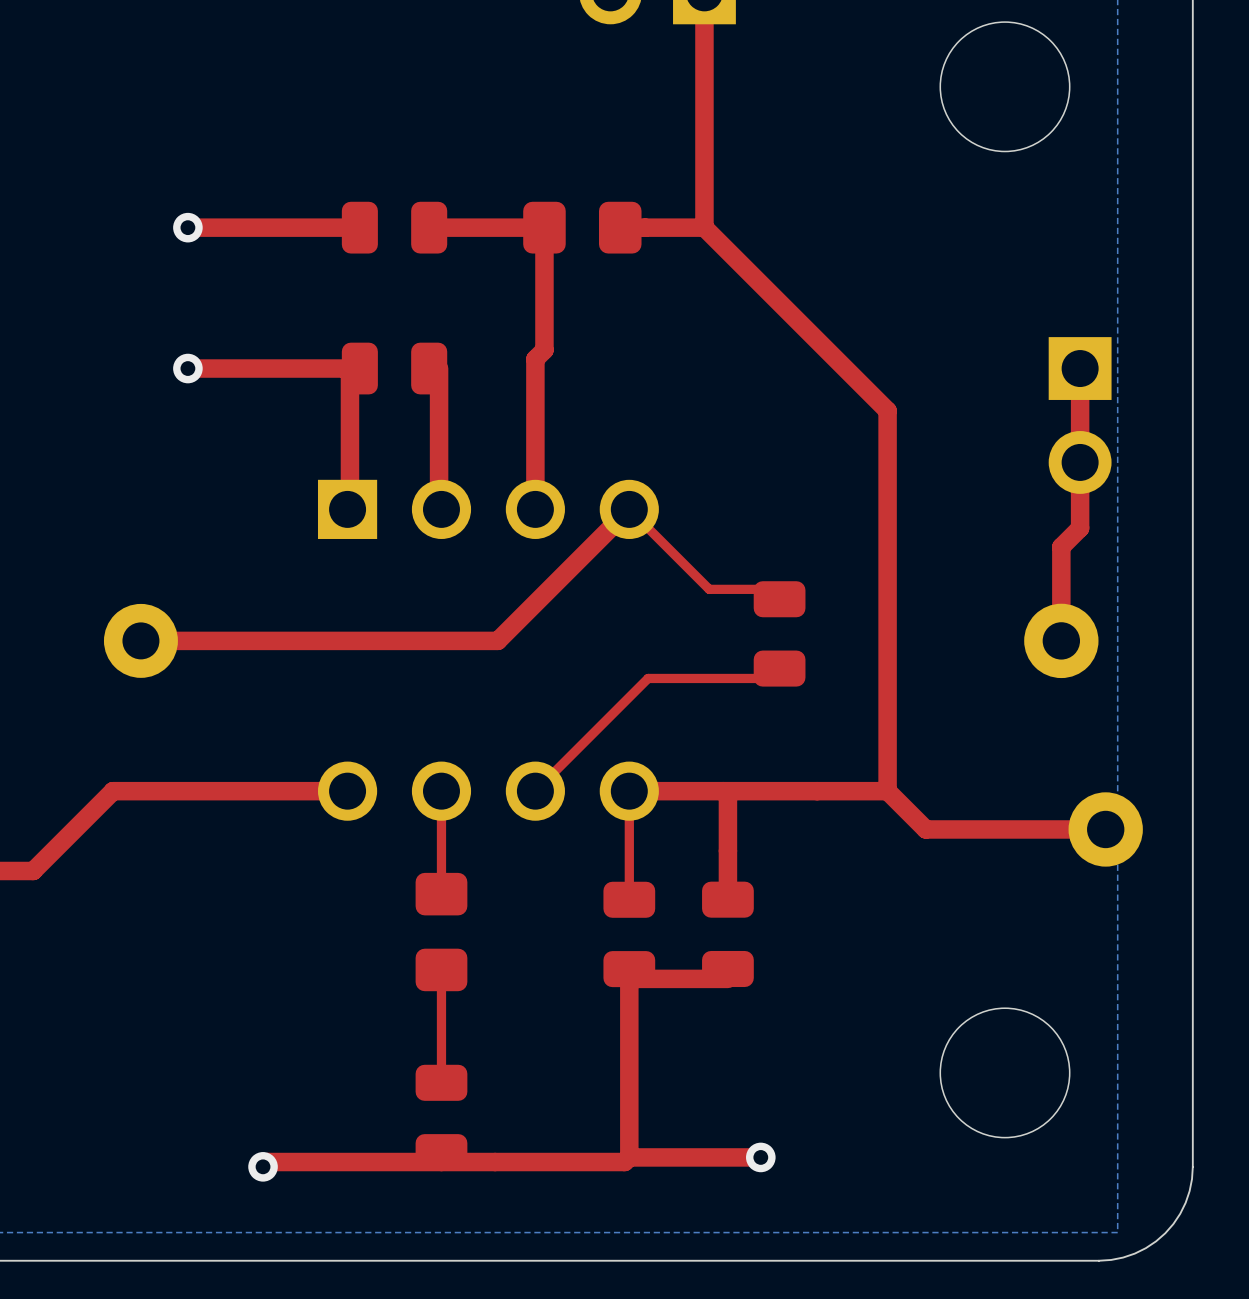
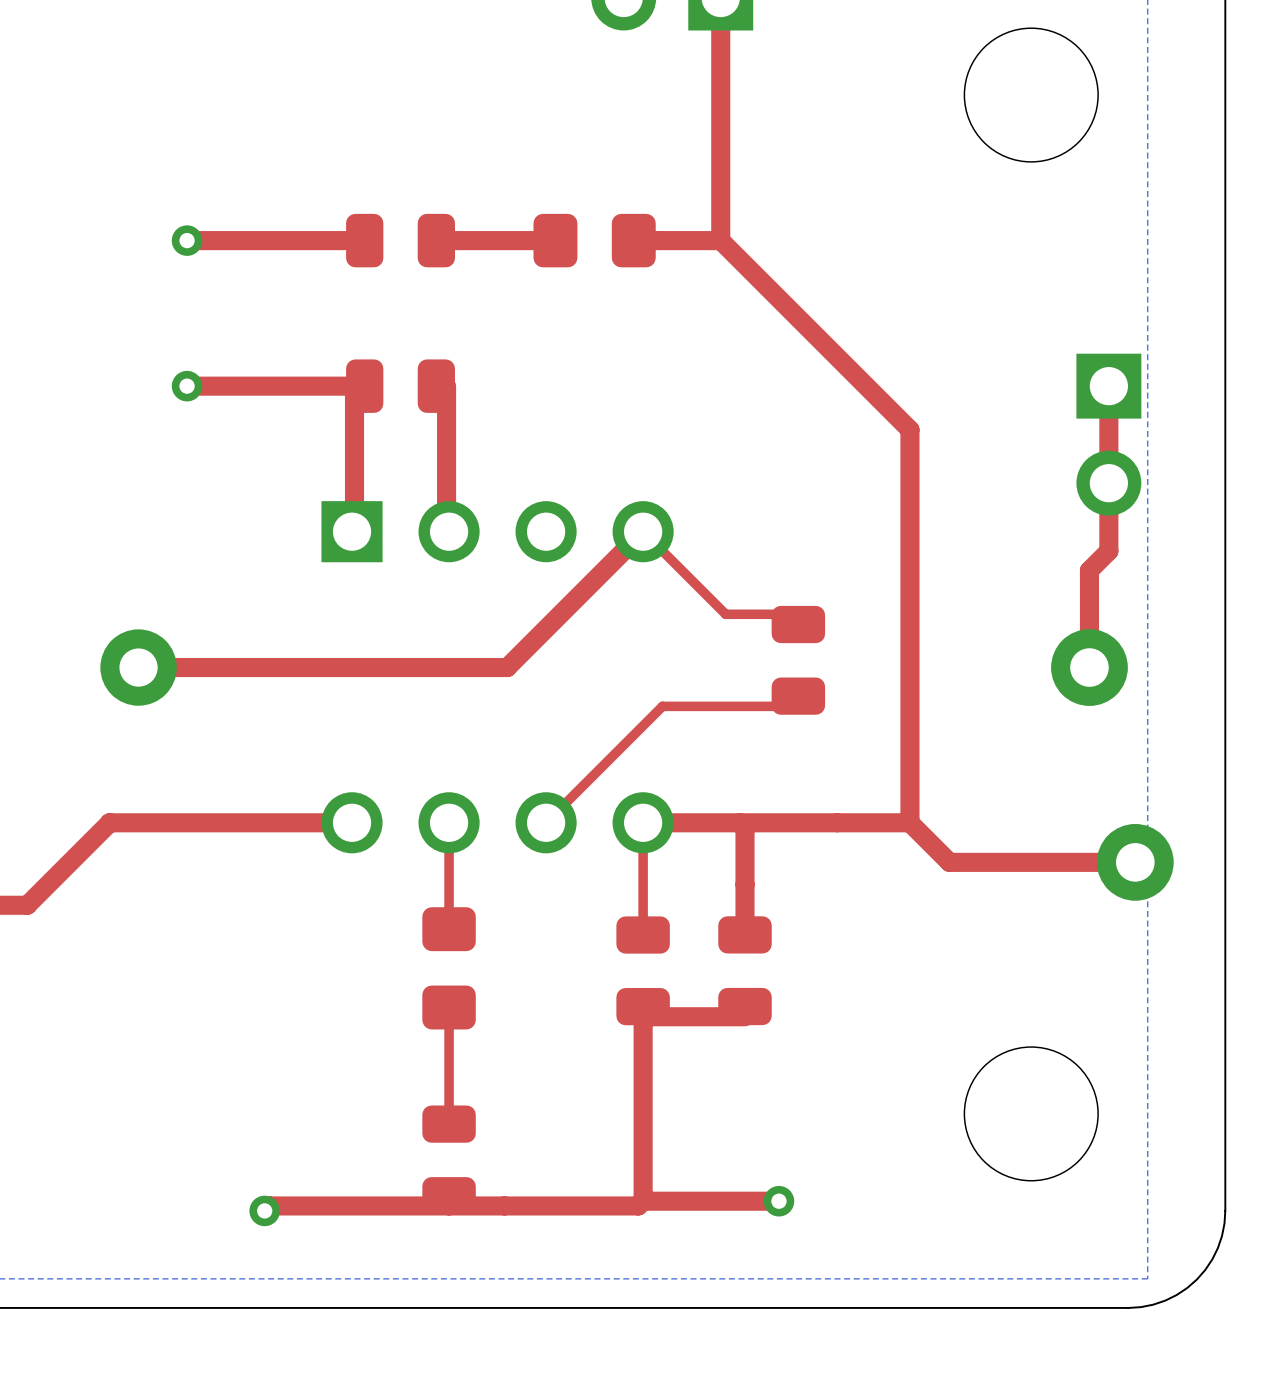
top track: (544, 227) (544, 350) (535, 359) (535, 509) -> none

